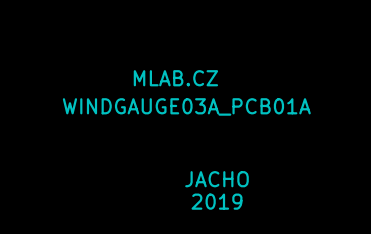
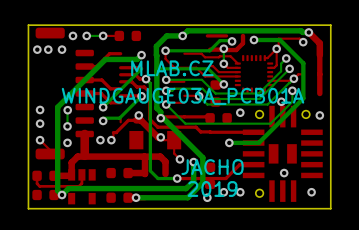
board edge: none -> (330, 25) (28, 25) (28, 208) (330, 208) (330, 25)
top track: none -> (308, 32) (319, 43) (319, 93)
bottom track: none -> (308, 32) (301, 30) (187, 30) (182, 35) (166, 35) (156, 46) (156, 108) (160, 112) (160, 118) (163, 118) (202, 157) (202, 182) (187, 197) (136, 197)
via: none -> (308, 32)
via: none -> (72, 35)
via: none -> (86, 35)
bottom track: none -> (103, 35) (86, 35)
via: none -> (103, 35)
top track: none -> (119, 35) (103, 35)
part: none -> (127, 35)
via: none -> (182, 35)
top track: none -> (226, 35) (207, 35)
top track: none -> (243, 35) (243, 43) (236, 50) (210, 49)
bottom track: none -> (253, 40) (280, 40) (303, 63) (303, 98) (258, 142) (229, 142)
via: none -> (253, 40)
bottom track: none -> (232, 41) (219, 40) (209, 50) (165, 50)
via: none -> (232, 41)
top track: none -> (303, 42) (299, 38) (278, 38) (278, 46) (267, 58) (264, 58)
via: none -> (303, 42)
bottom track: none -> (223, 48) (223, 63)
via: none -> (223, 48)
top track: none -> (276, 48) (276, 65) (270, 67)
via: none -> (276, 48)
via: none -> (37, 49)
via: none -> (48, 49)
via: none -> (62, 49)
top track: none -> (165, 50) (165, 58) (174, 67) (196, 67) (205, 76) (237, 76)
via: none -> (165, 50)
top track: none -> (120, 53) (109, 53) (96, 66) (84, 66)
top track: none -> (184, 53) (201, 53) (205, 57) (220, 56)
bottom track: none -> (141, 55) (137, 59) (105, 59) (57, 107) (57, 190) (62, 194) (68, 188) (186, 188) (193, 181) (193, 162)
via: none -> (141, 55)
top track: none -> (220, 56) (230, 56) (237, 63)
bottom track: none -> (286, 58) (281, 63) (281, 71) (258, 93) (215, 93) (201, 79) (166, 79)
via: none -> (286, 58)
top track: none -> (223, 63) (227, 67) (237, 67)
via: none -> (223, 63)
top track: none -> (210, 66) (212, 66) (218, 72) (237, 72)
top track: none -> (120, 67) (141, 68)
bottom track: none -> (141, 68) (103, 107)
bottom track: none -> (289, 68) (259, 99) (212, 99) (202, 88) (174, 88) (172, 90) (166, 90)
via: none -> (289, 68)
bottom track: none -> (156, 71) (159, 68) (208, 68) (223, 84)
top track: none -> (120, 74) (135, 74) (139, 79) (146, 79)
part: none -> (253, 74)
top track: none -> (303, 74) (298, 74) (291, 80) (270, 80)
bottom track: none -> (293, 78) (267, 104) (207, 104) (199, 96)
via: none -> (293, 78)
bottom track: none -> (146, 79) (150, 83) (150, 170) (158, 178) (177, 178)
via: none -> (146, 79)
top track: none -> (166, 79) (168, 81) (184, 81)
via: none -> (166, 79)
top track: none -> (84, 80) (101, 80) (110, 88) (120, 88)
top track: none -> (120, 81) (131, 81) (136, 87) (144, 87) (149, 92) (149, 119) (157, 127) (195, 127) (200, 131) (253, 132)
via: none -> (223, 84)
via: none -> (166, 90)
bottom track: none -> (292, 90) (292, 101) (270, 123) (185, 123) (166, 104)
via: none -> (292, 90)
part: none -> (64, 93)
top track: none -> (84, 93) (101, 93) (110, 102) (120, 102)
part: none -> (215, 93)
top track: none -> (120, 95) (141, 96)
bottom track: none -> (141, 96) (119, 118) (103, 118)
via: none -> (141, 96)
top track: none -> (184, 95) (199, 96)
via: none -> (199, 96)
via: none -> (281, 101)
top track: none -> (184, 102) (166, 104)
via: none -> (166, 104)
via: none -> (103, 107)
via: none -> (40, 109)
bottom track: none -> (67, 110) (67, 126)
via: none -> (67, 110)
via: none -> (240, 112)
via: none -> (138, 115)
top track: none -> (207, 115) (160, 118)
via: none -> (319, 115)
top track: none -> (120, 117) (120, 122)
via: none -> (160, 118)
part: none -> (218, 118)
via: none -> (103, 120)
via: none -> (40, 123)
via: none -> (67, 126)
top track: none -> (84, 134) (84, 155)
via: none -> (160, 137)
top track: none -> (40, 140) (50, 150) (50, 153)
via: none -> (40, 140)
via: none -> (100, 140)
top track: none -> (111, 140) (113, 132) (116, 132) (128, 120) (140, 120) (158, 137) (163, 140) (174, 140) (174, 153) (179, 159)
via: none -> (111, 140)
part: none -> (155, 140)
via: none -> (67, 142)
via: none -> (229, 142)
part: none -> (282, 153)
top track: none -> (144, 156) (145, 173) (127, 173)
via: none -> (179, 159)
via: none -> (193, 162)
top track: none -> (253, 164) (239, 164) (225, 178) (177, 178)
part: none -> (119, 173)
via: none -> (284, 173)
top track: none -> (165, 173) (165, 161) (160, 156) (77, 156) (71, 162) (70, 175) (53, 175)
top track: none -> (81, 174) (81, 183) (78, 186) (39, 186) (37, 183) (37, 175)
part: none -> (45, 175)
part: none -> (210, 175)
via: none -> (177, 178)
part: none -> (81, 186)
via: none -> (223, 192)
via: none -> (240, 192)
via: none -> (311, 192)
part: none -> (45, 194)
via: none -> (62, 194)
part: none -> (119, 197)
via: none -> (136, 197)
via: none -> (207, 197)

